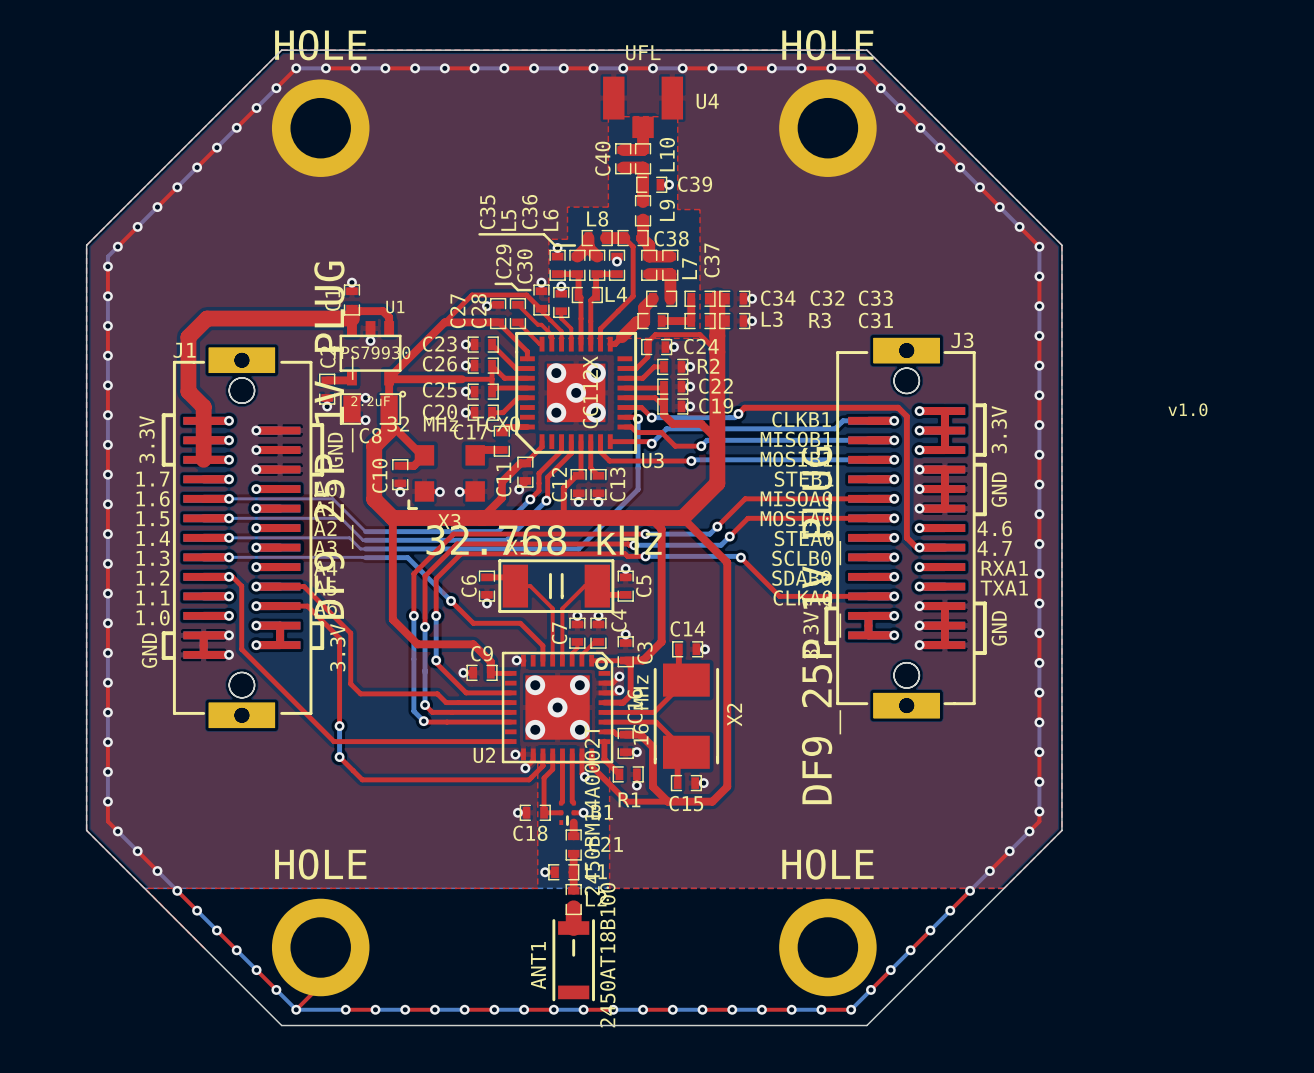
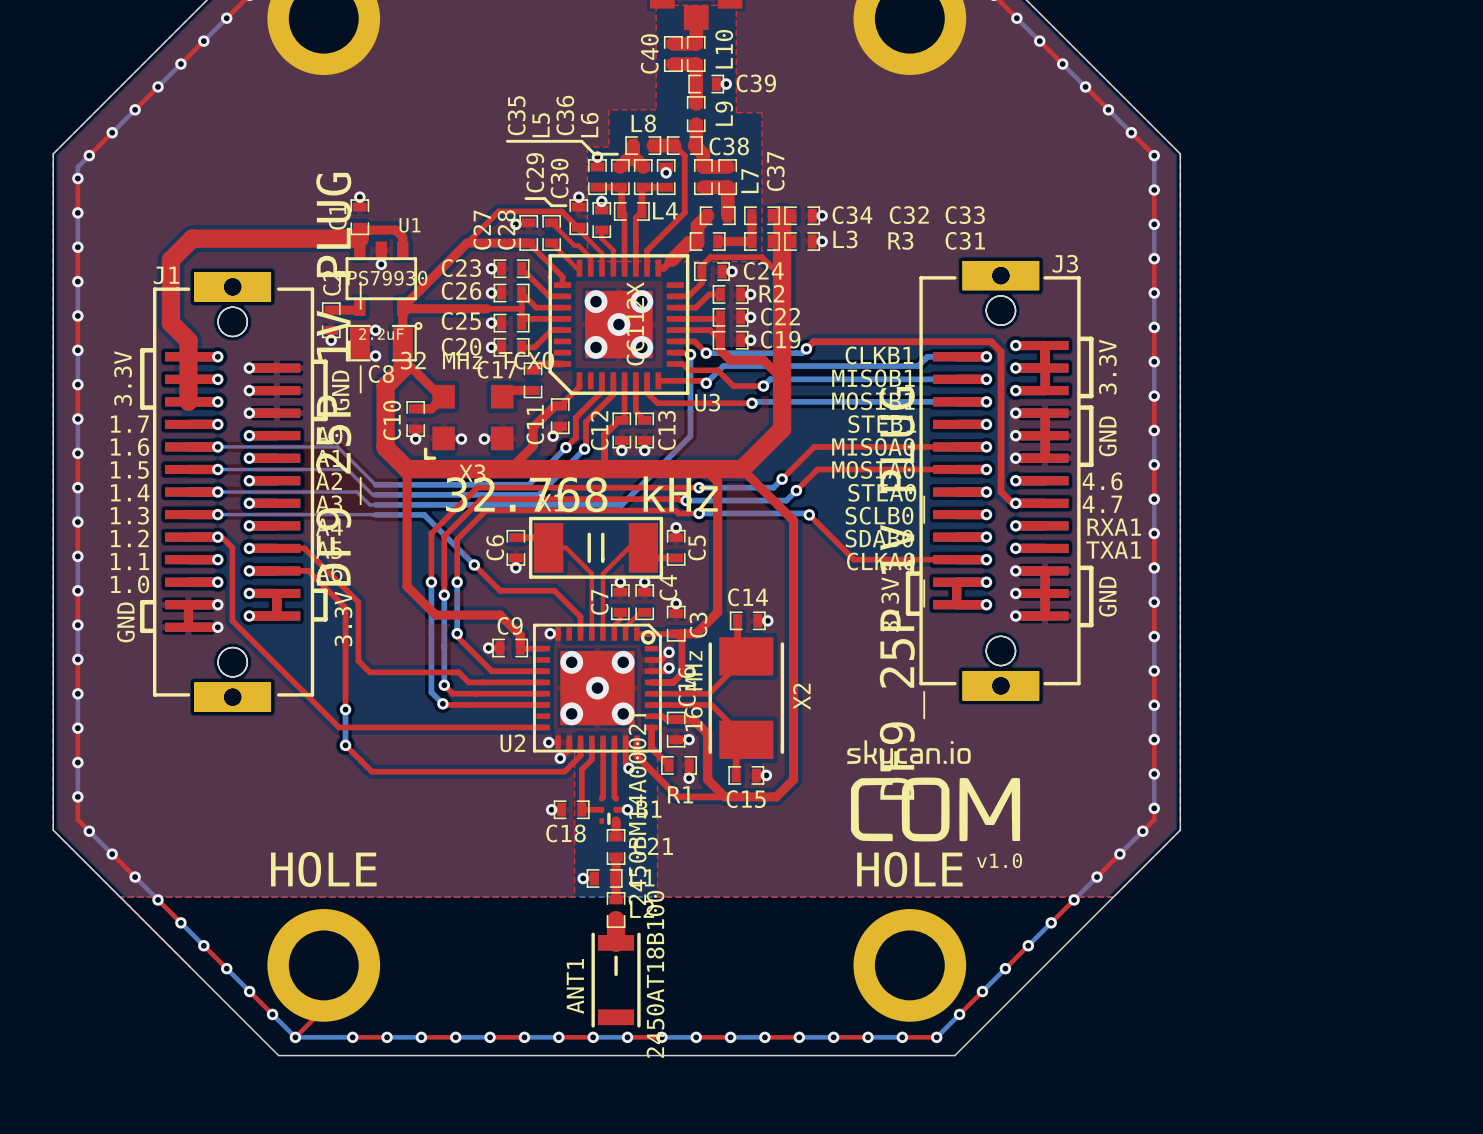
text: v1.0 (1187, 409) -> none
drawing: none -> [847, 740, 1021, 842]
text: none -> v1.0 (999, 860)

